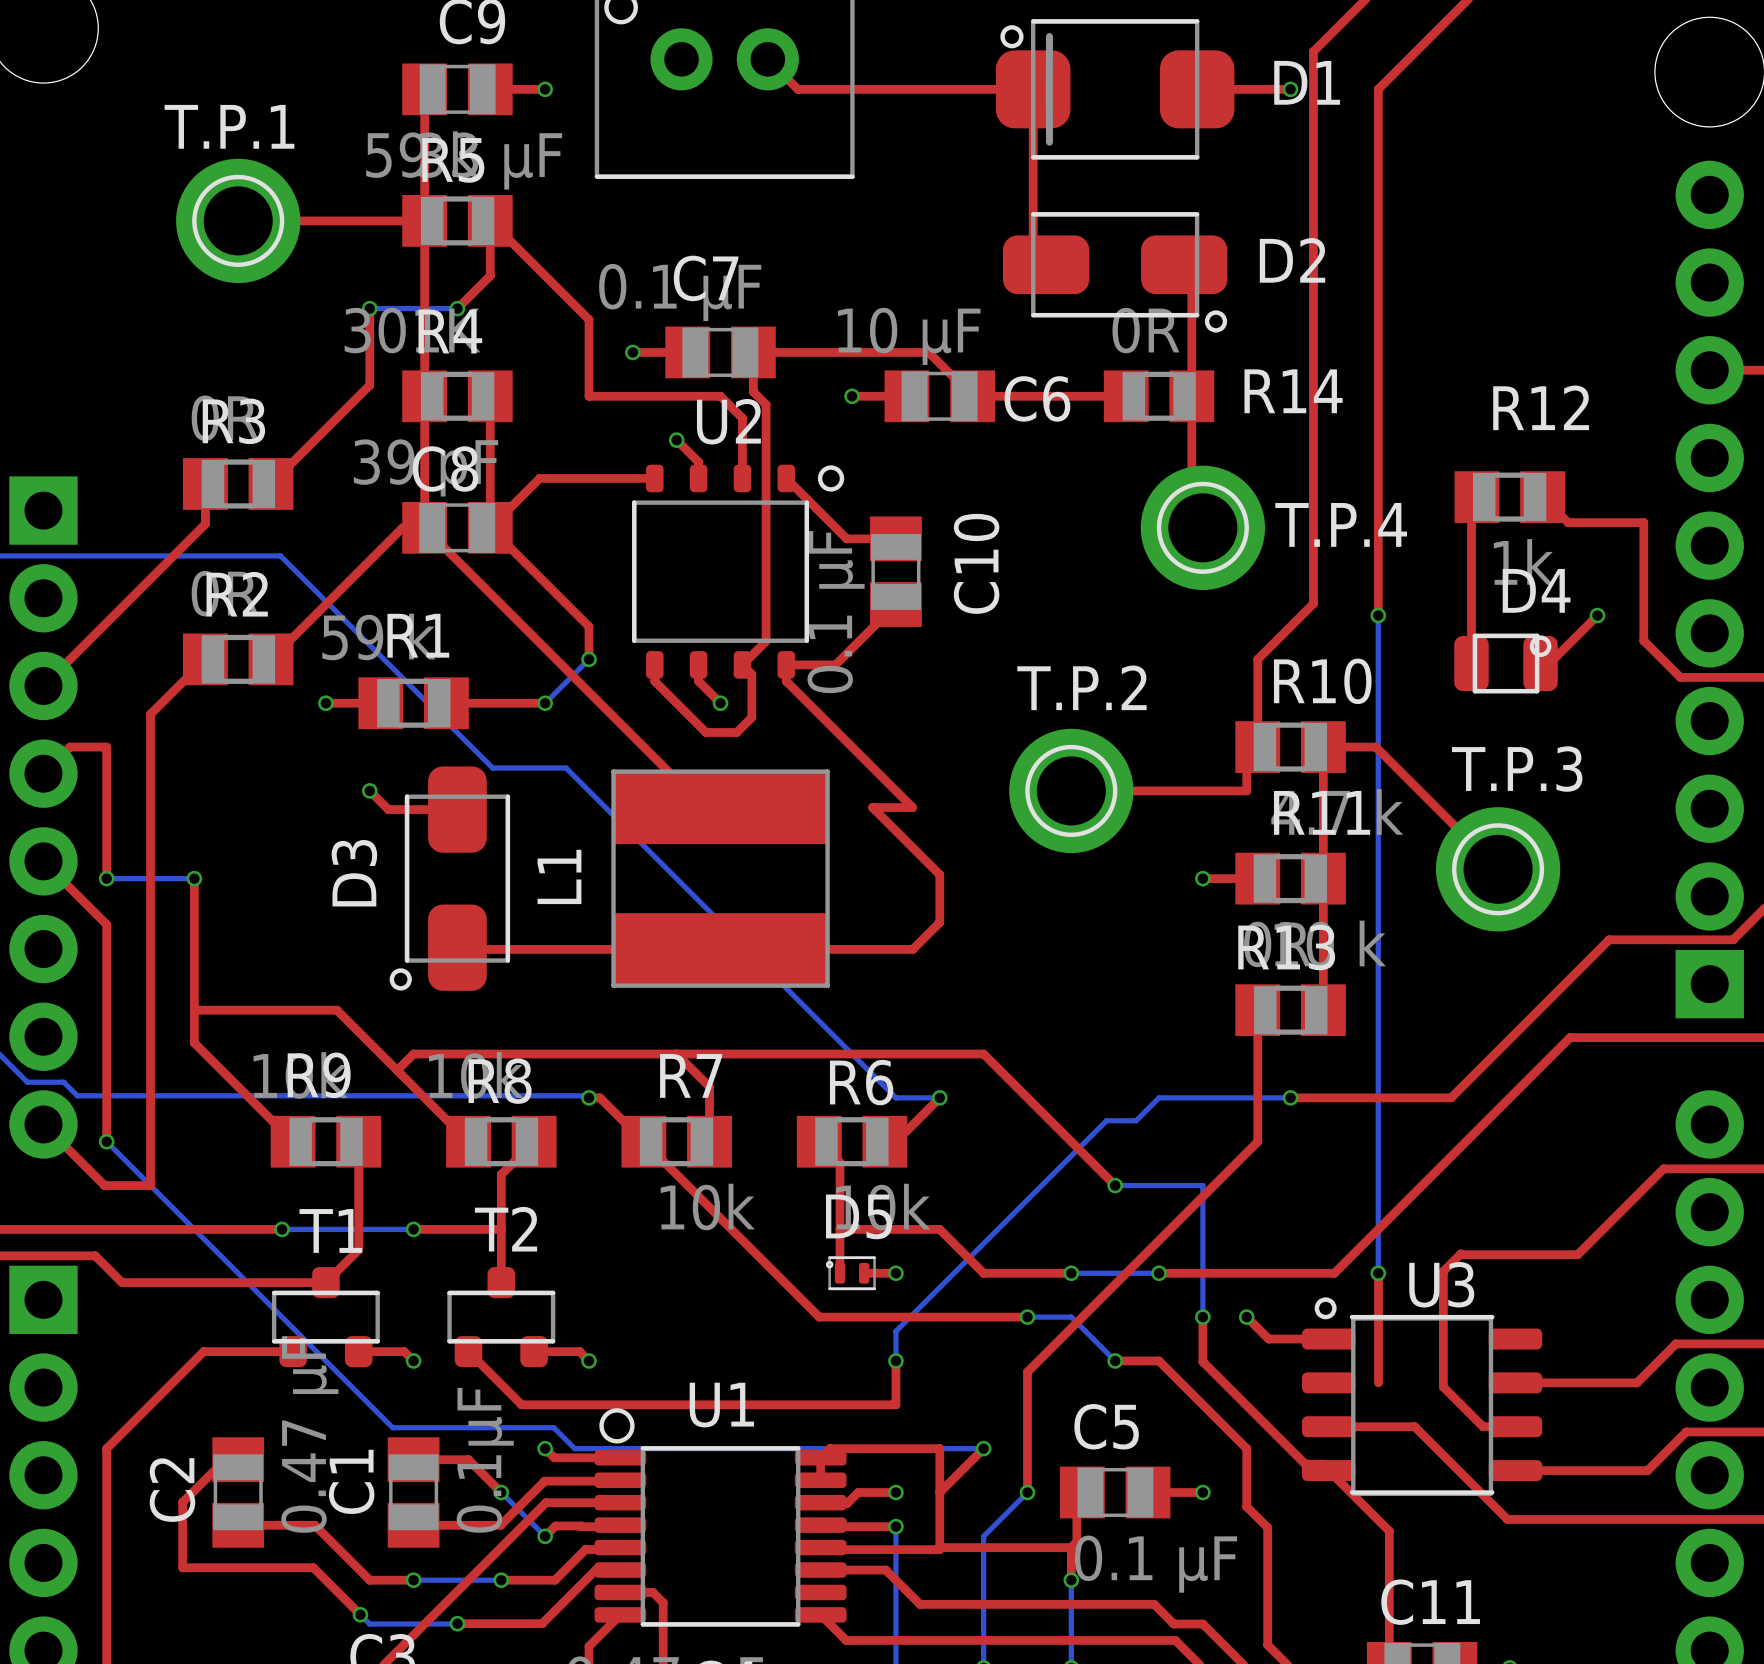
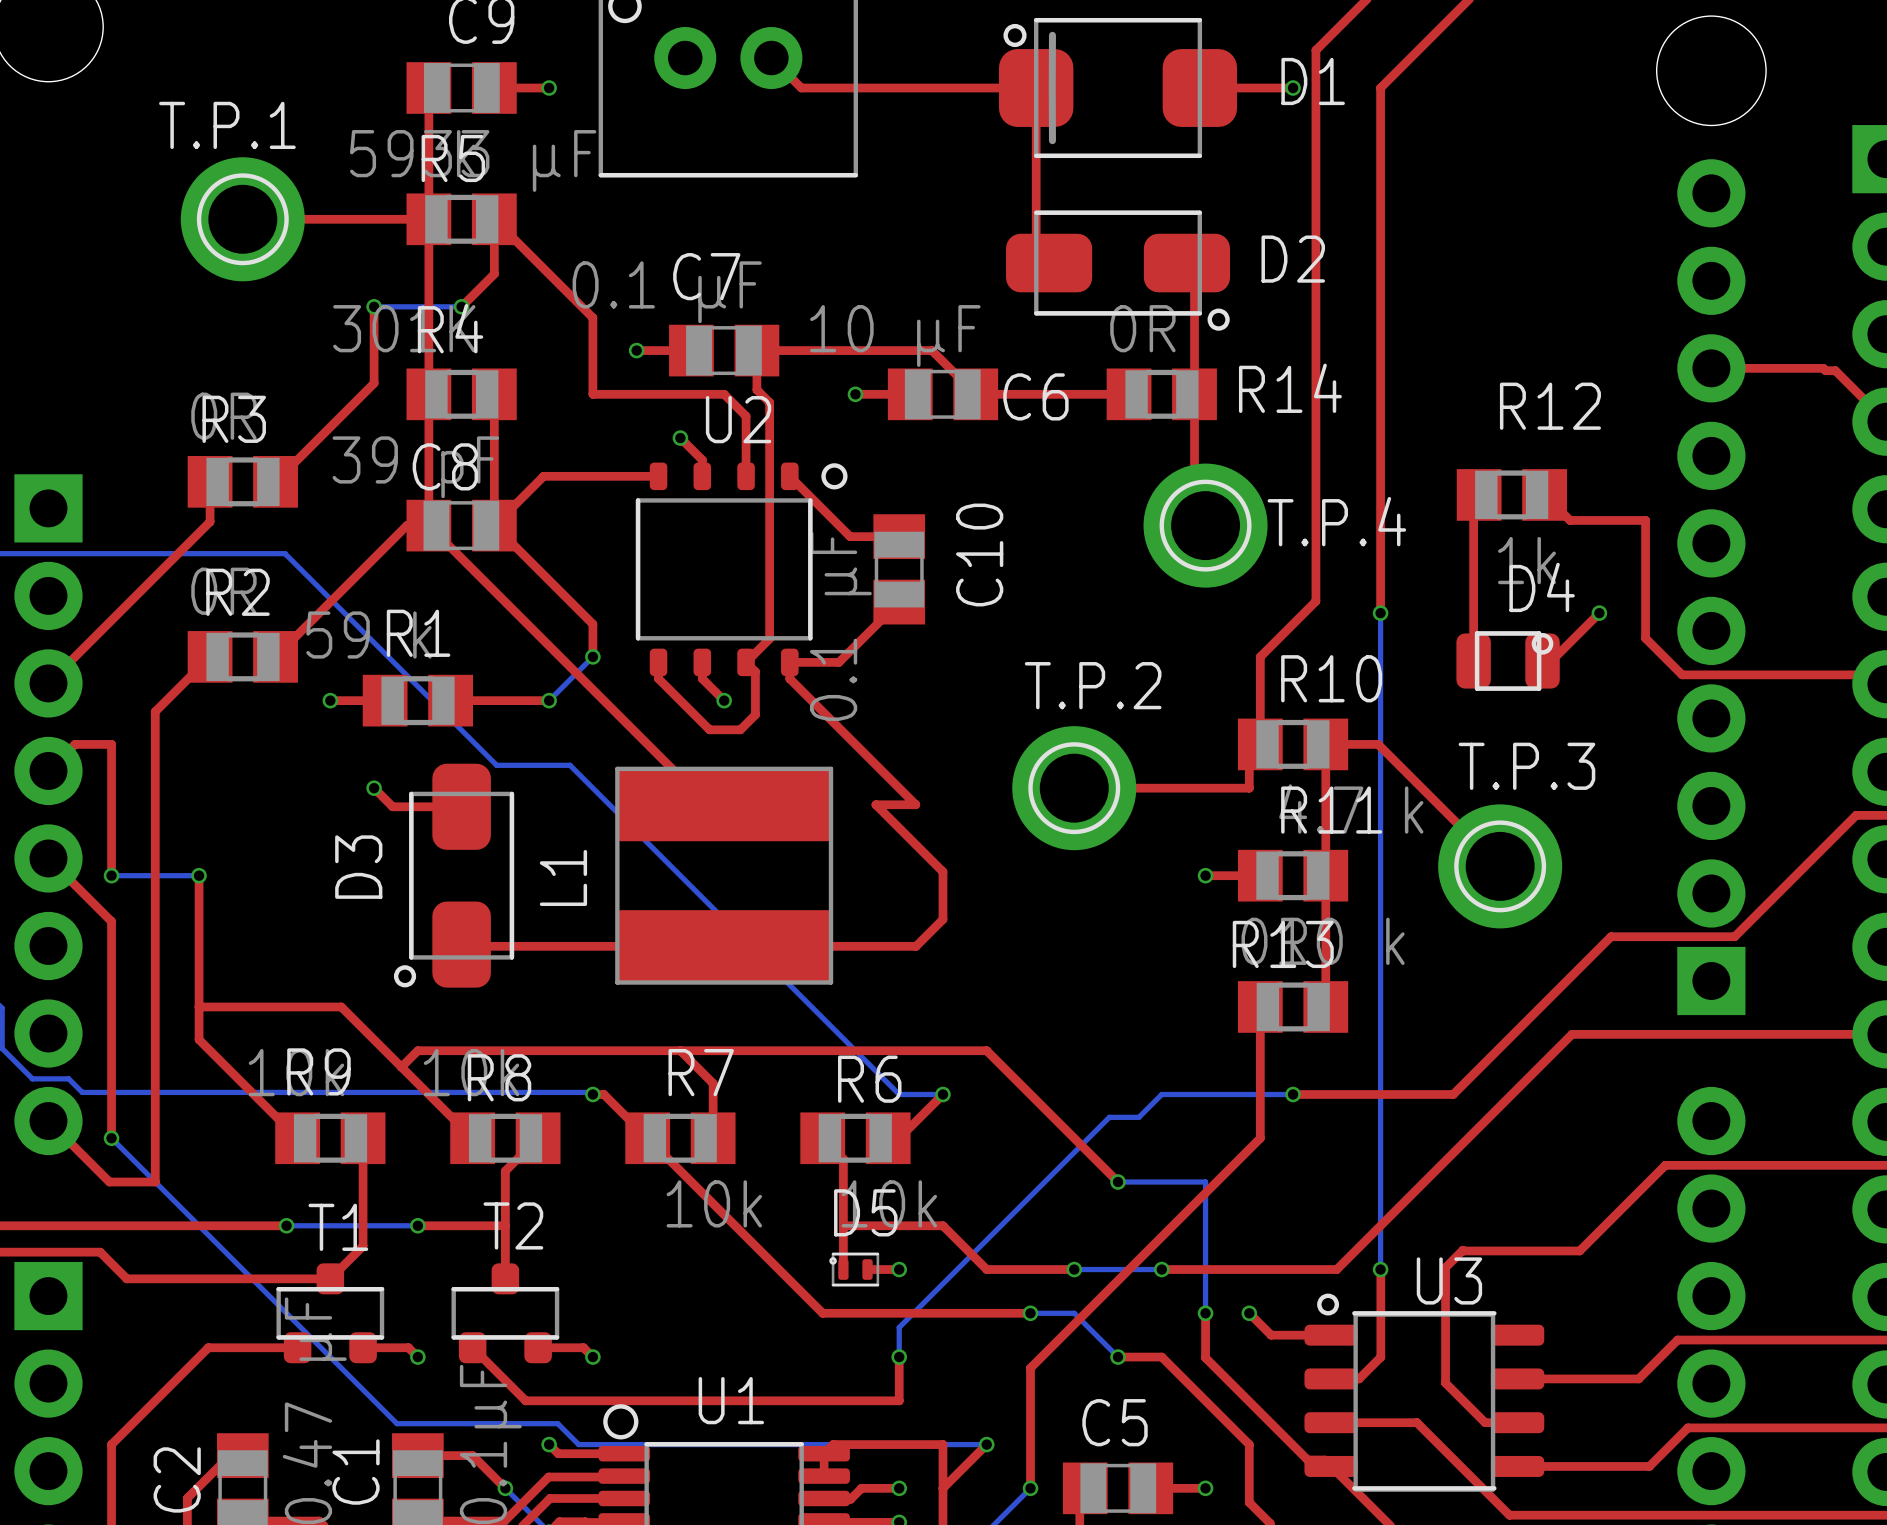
top track: (1378, 1361) (1378, 1382) -> (1380, 1357) (1359, 1378) (1331, 1378)

